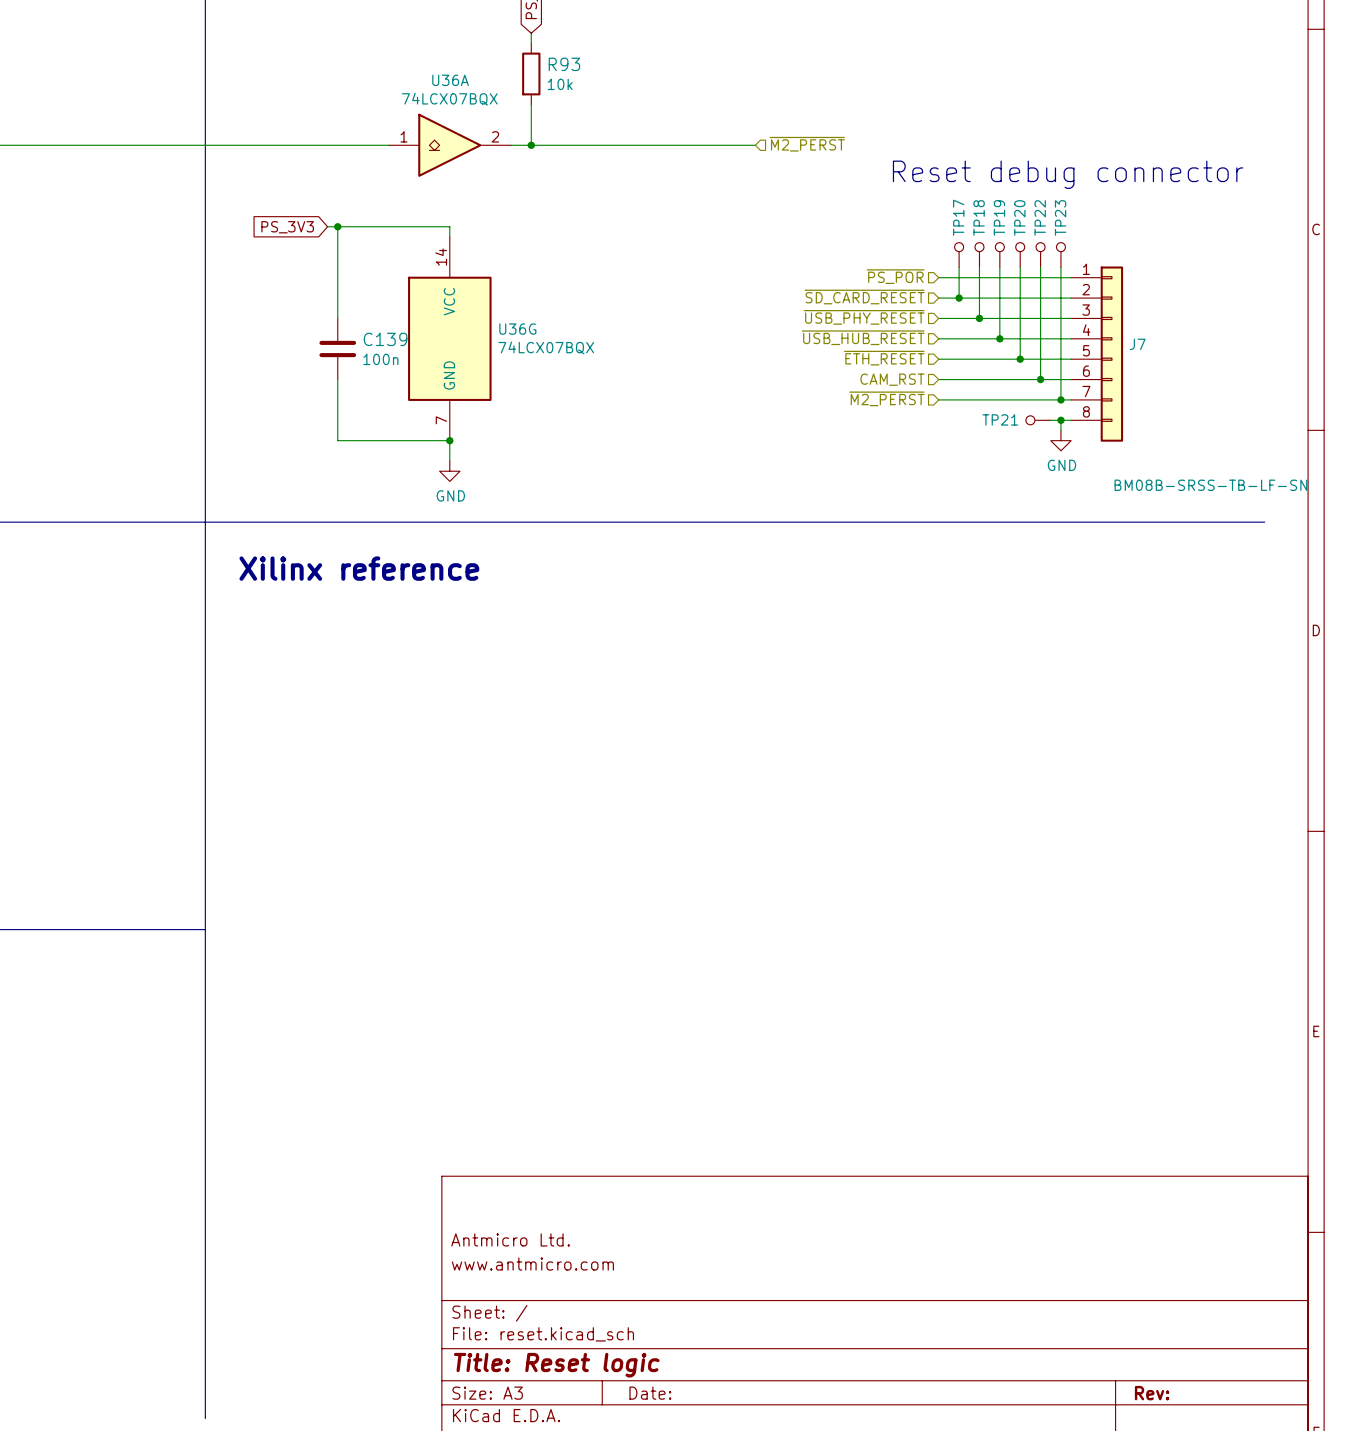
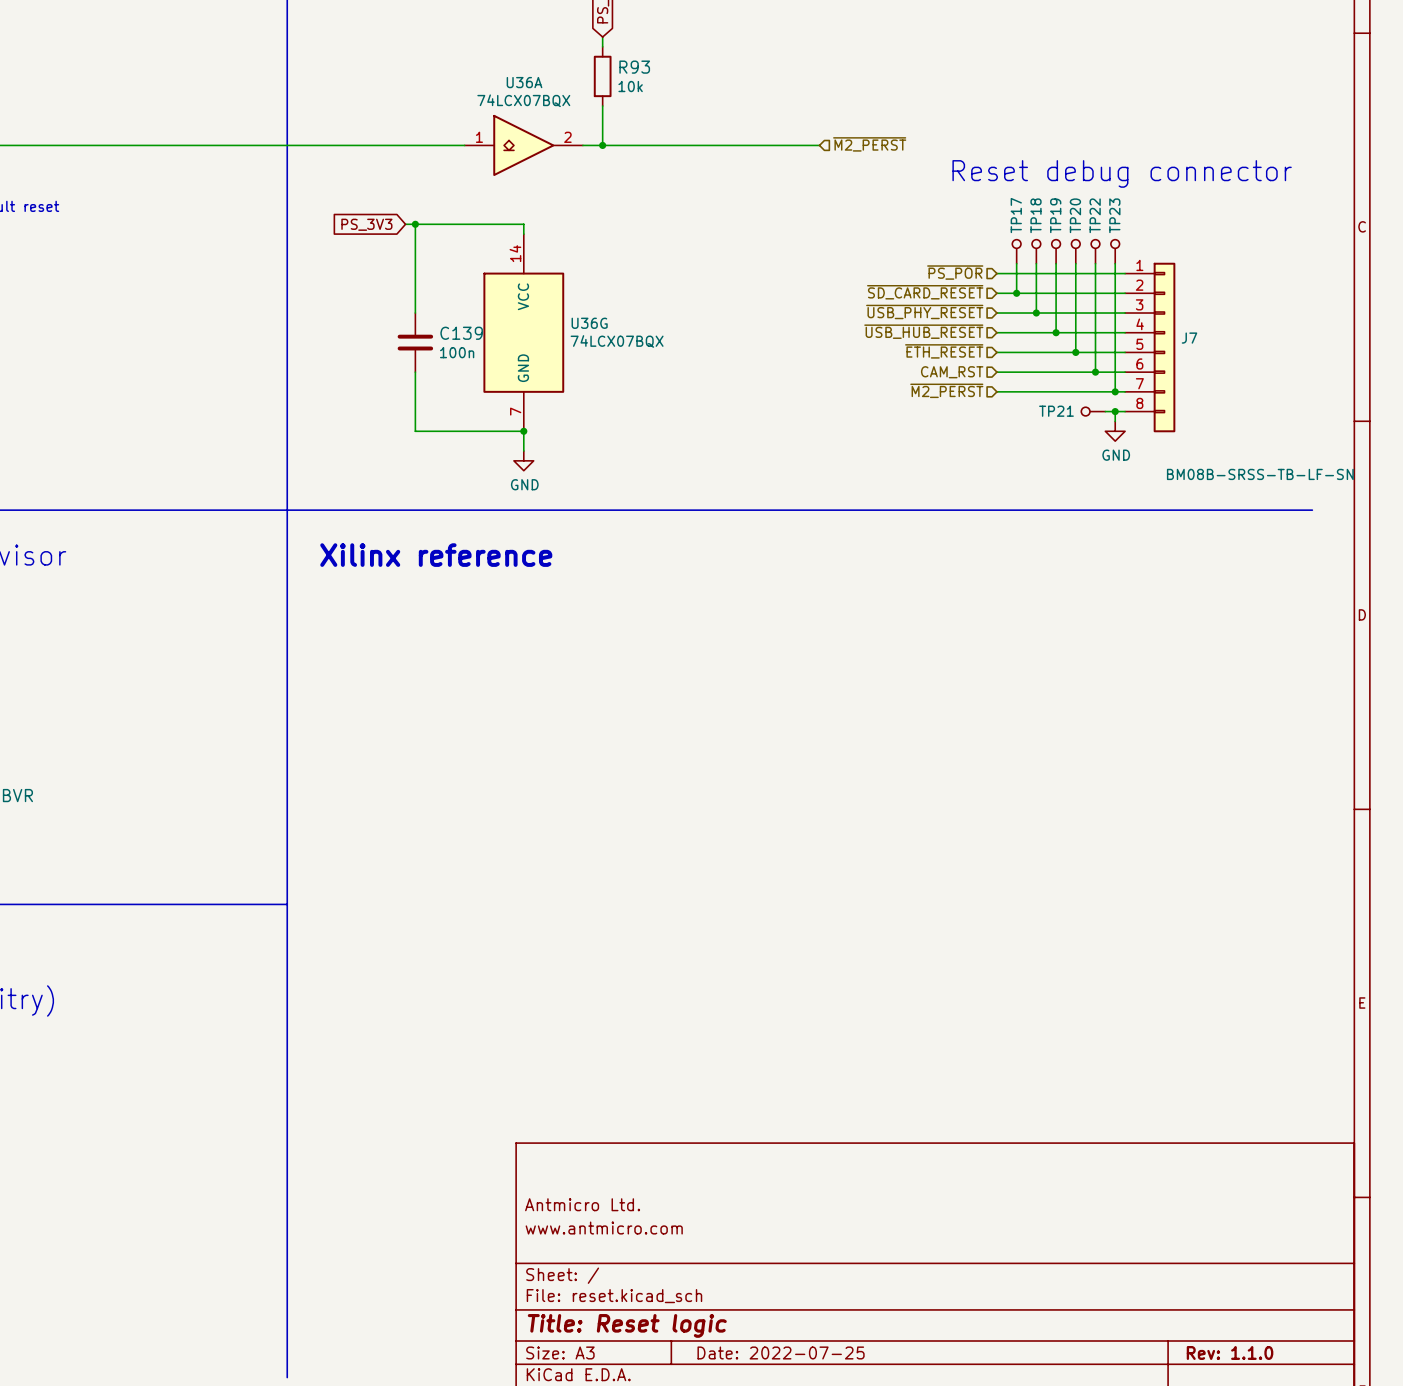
title block: Date: (650, 1393) -> Date: 2022-07-25 (781, 1352)
title block: Rev: (1152, 1393) -> Rev: 1.1.0 (1230, 1352)

